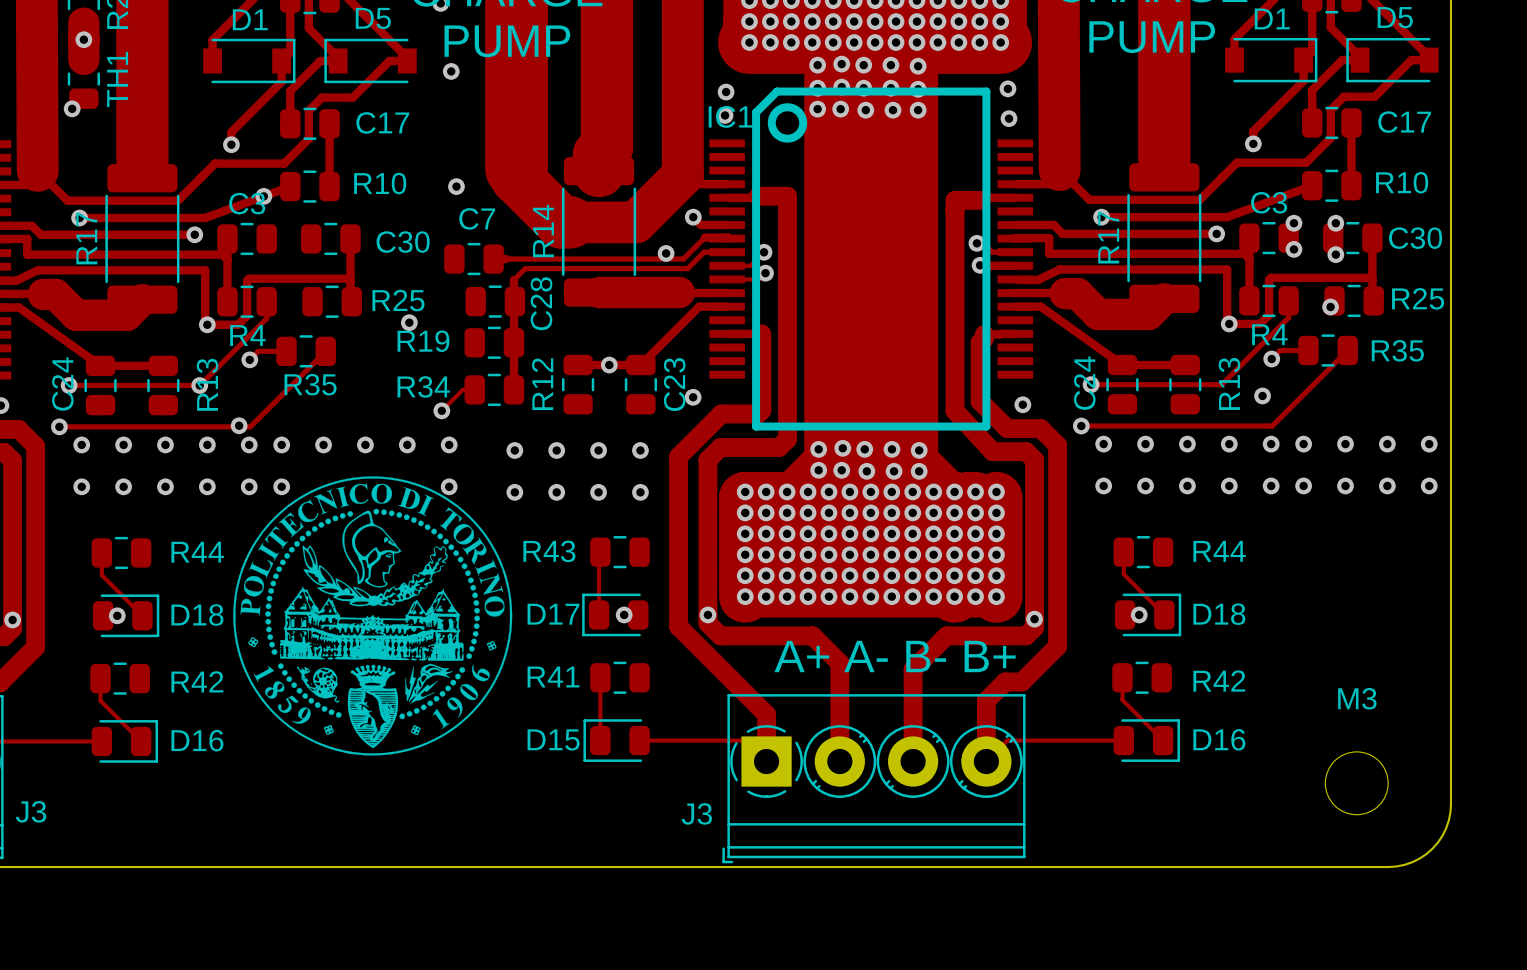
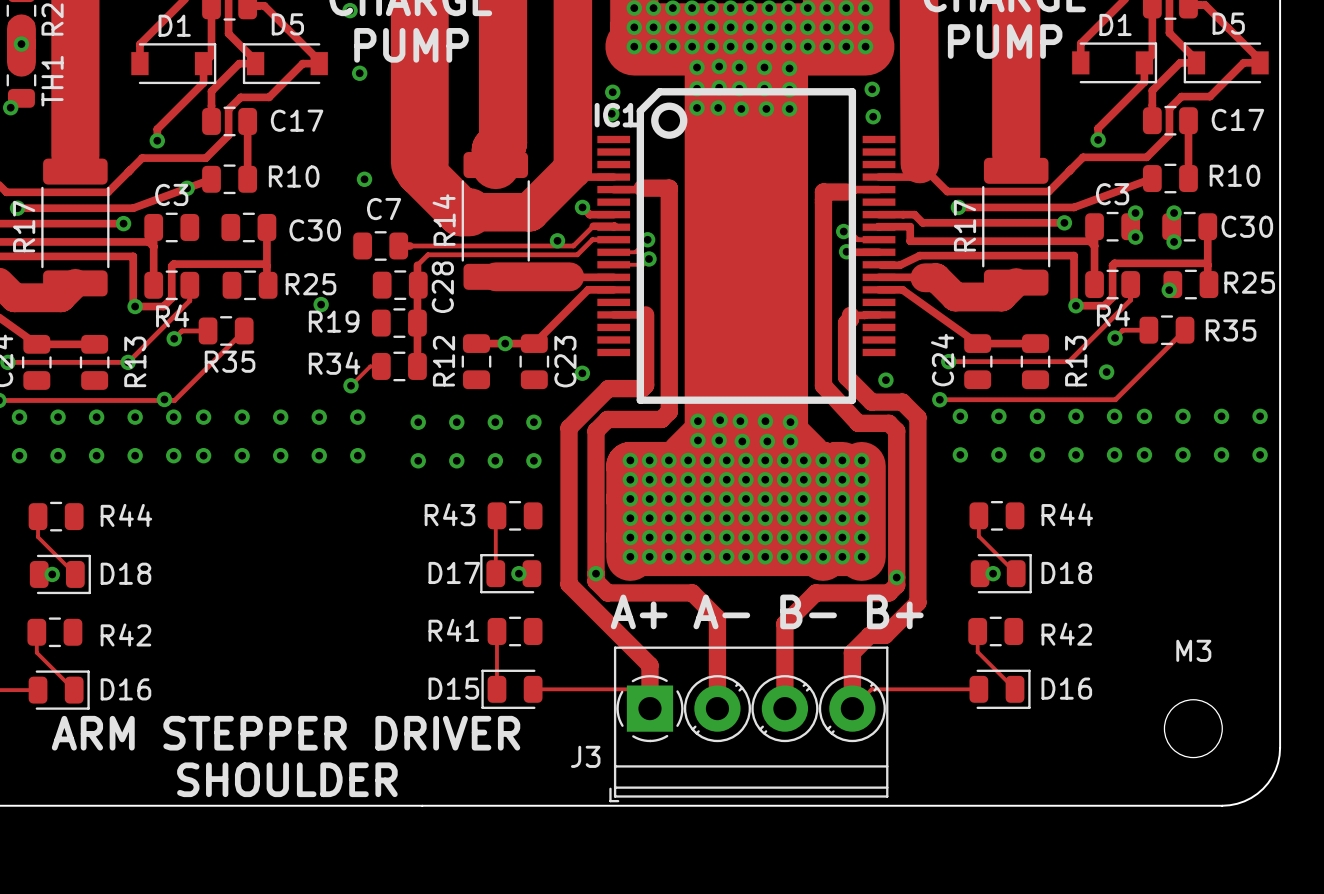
drawing: [233, 476, 513, 756] -> none
via: none -> (242, 455)
via: none -> (280, 455)
via: none -> (319, 455)
text: none -> ARM STEPPER DRIVER (286, 733)
text: none -> SHOULDER (287, 779)

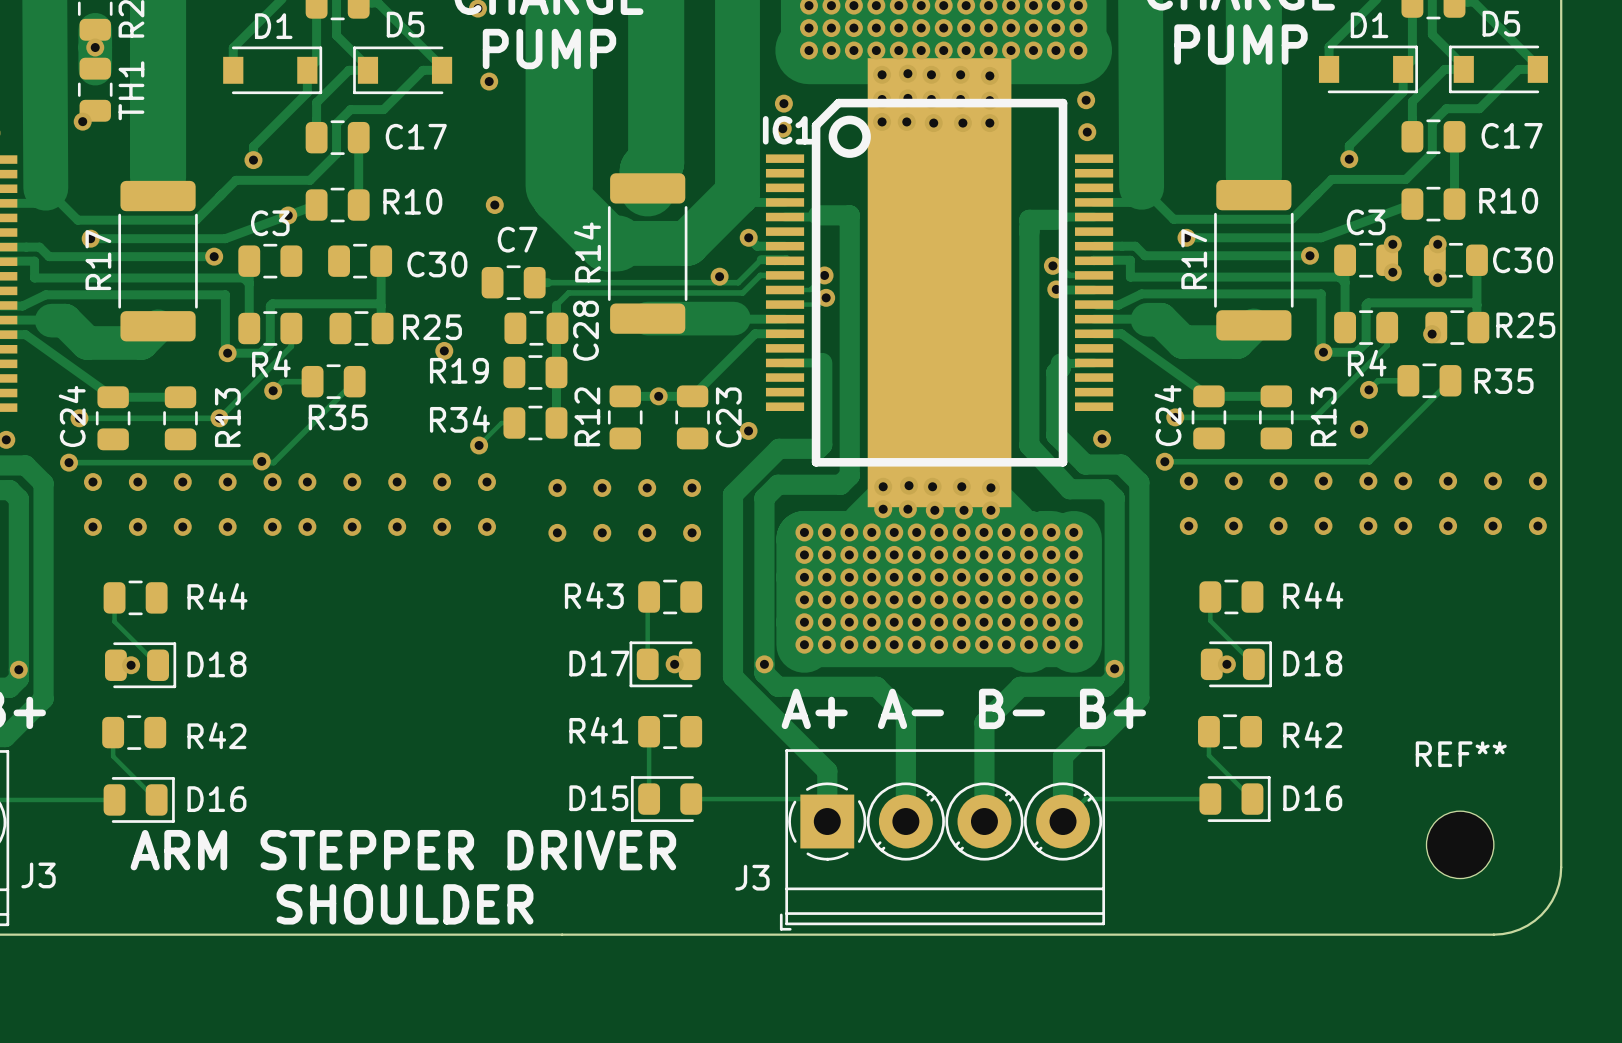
M3 name: M3 (1193, 650) -> REF** (1461, 754)

